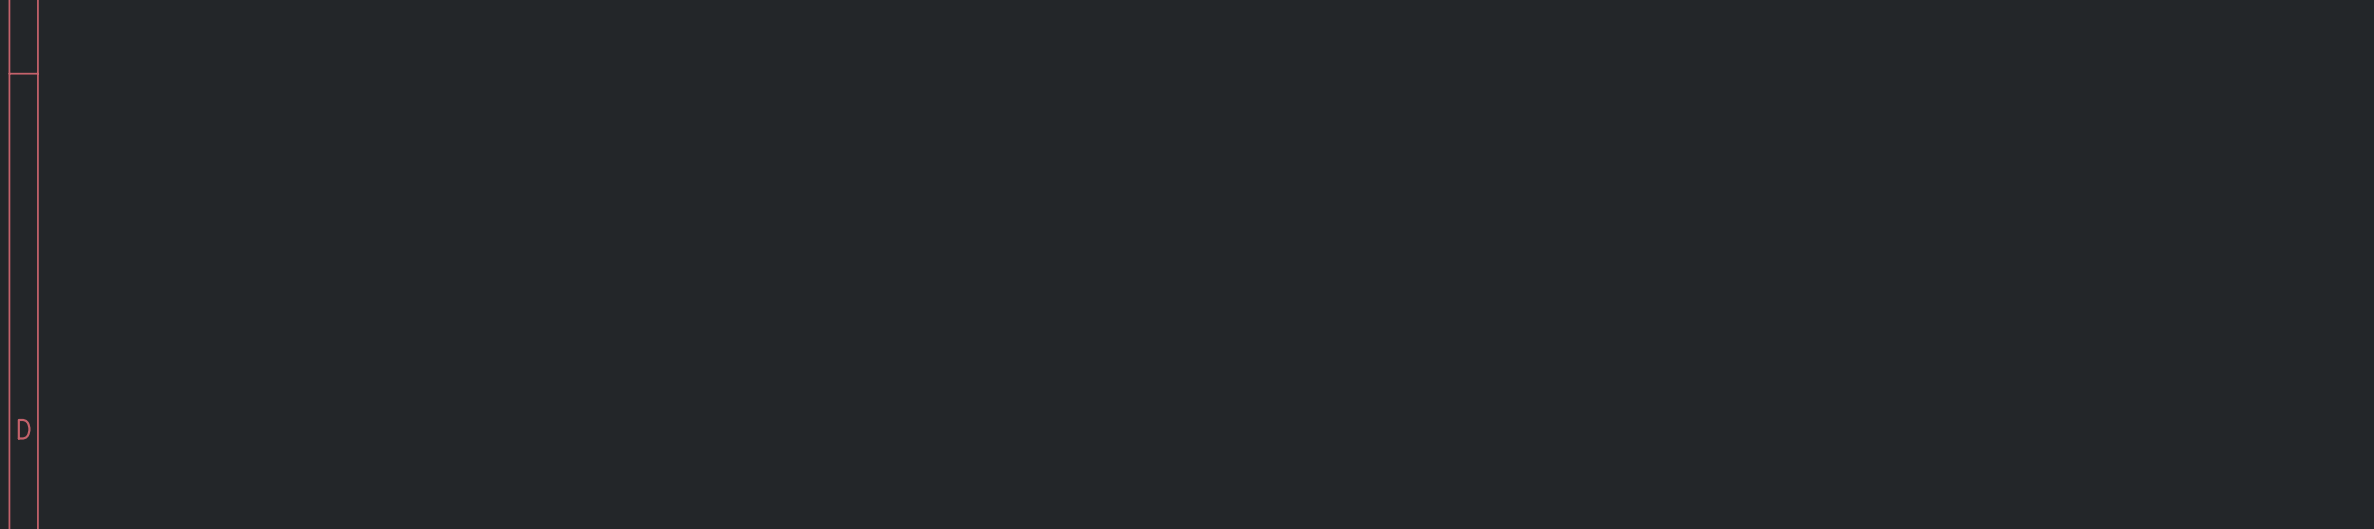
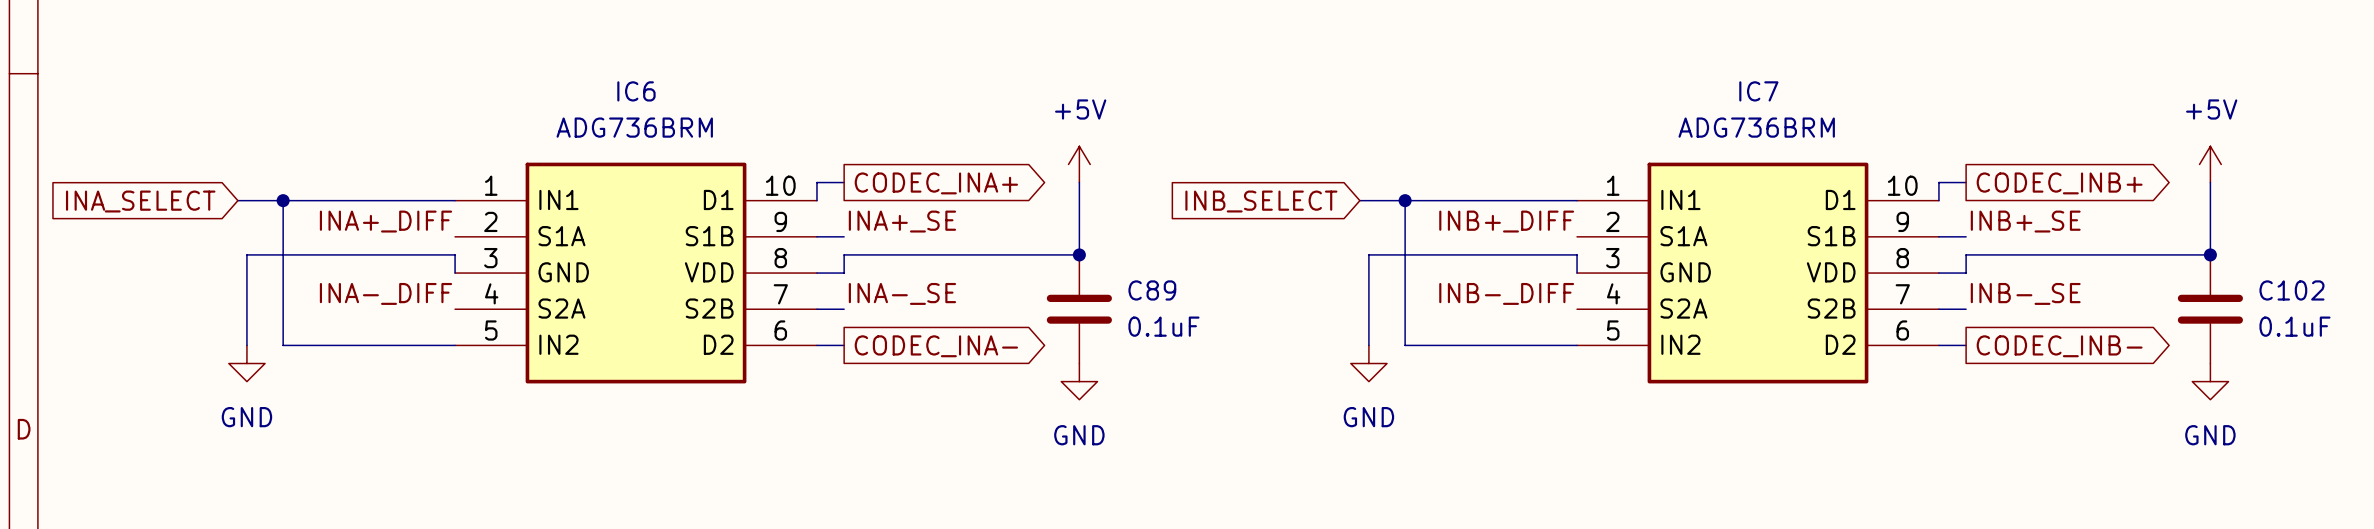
power symbol: none -> +5V (1079, 164)
power symbol: none -> +5V (2210, 164)
wire: none -> (844, 182) (816, 182) (816, 200)
wire: none -> (1079, 182) (1079, 254) (844, 254) (844, 273) (816, 273)
wire: none -> (1966, 182) (1938, 182) (1938, 200)
wire: none -> (2210, 182) (2210, 254) (1966, 254) (1966, 273) (1938, 273)
global label: none -> CODEC_INA+ (936, 183)
global label: none -> CODEC_INB+ (2059, 183)
wire: none -> (237, 200) (455, 200)
wire: none -> (283, 200) (283, 345) (455, 345)
junction: none -> (283, 200)
wire: none -> (1359, 200) (1577, 200)
wire: none -> (1405, 200) (1405, 345) (1577, 345)
junction: none -> (1405, 200)
global label: none -> INA_SELECT (140, 201)
global label: none -> INB_SELECT (1261, 201)
label: none -> INA+_DIFF (385, 221)
label: none -> INA+_SE (902, 221)
label: none -> INB+_DIFF (1506, 221)
label: none -> INB+_SE (2025, 221)
wire: none -> (816, 236) (844, 236)
wire: none -> (1938, 236) (1966, 236)
junction: none -> (1079, 254)
junction: none -> (2210, 254)
wire: none -> (455, 273) (455, 254) (246, 254) (246, 345)
IC6: none -> ADG736BRM (636, 273)
wire: none -> (1577, 273) (1577, 254) (1368, 254) (1368, 345)
IC7: none -> ADG736BRM (1757, 273)
label: none -> INA-_DIFF (385, 293)
label: none -> INA-_SE (902, 293)
label: none -> INB-_DIFF (1506, 293)
label: none -> INB-_SE (2025, 293)
wire: none -> (816, 309) (844, 309)
C89: none -> 0.1uF (1079, 309)
wire: none -> (1938, 309) (1966, 309)
C102: none -> 0.1uF (2210, 309)
wire: none -> (816, 345) (844, 345)
wire: none -> (1938, 345) (1966, 345)
global label: none -> CODEC_INA- (936, 346)
global label: none -> CODEC_INB- (2059, 346)
power symbol: none -> GND (246, 363)
power symbol: none -> GND (1368, 363)
power symbol: none -> GND (1079, 381)
power symbol: none -> GND (2210, 381)

